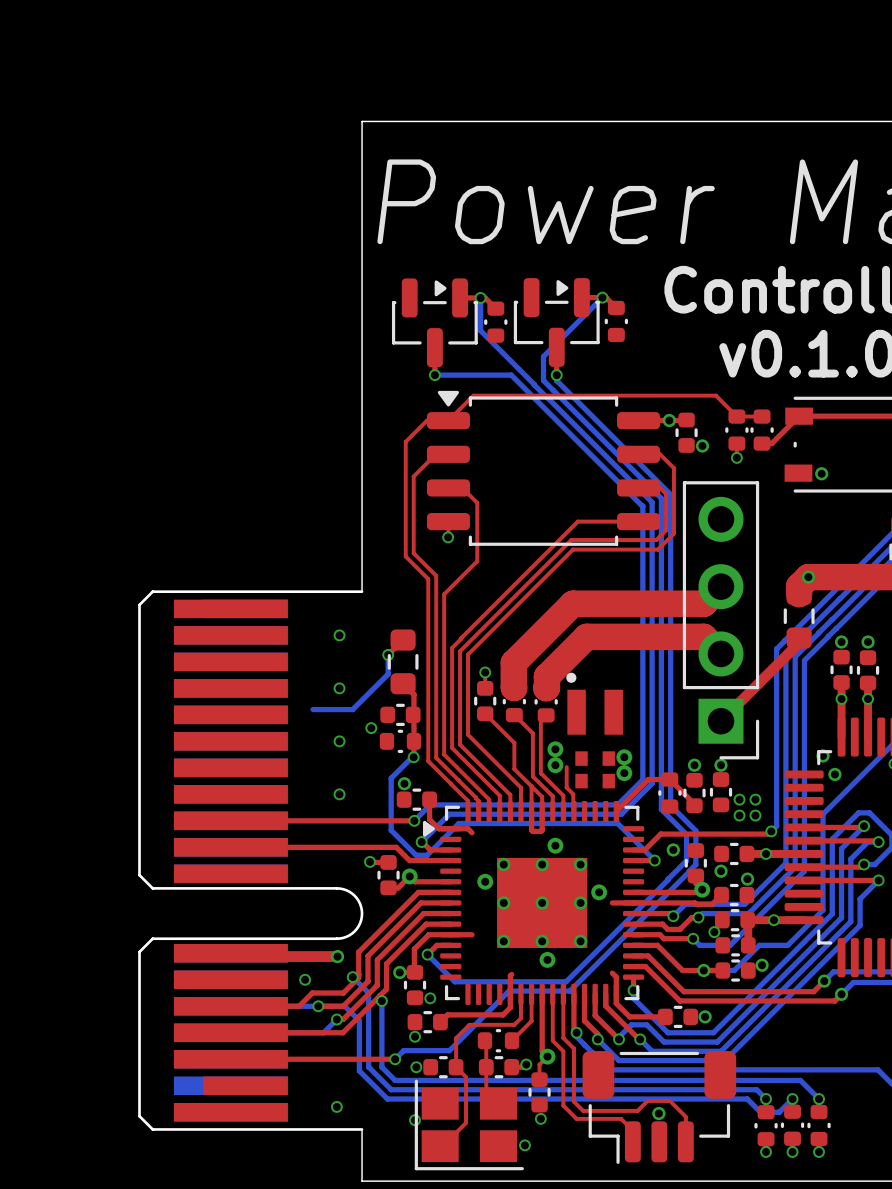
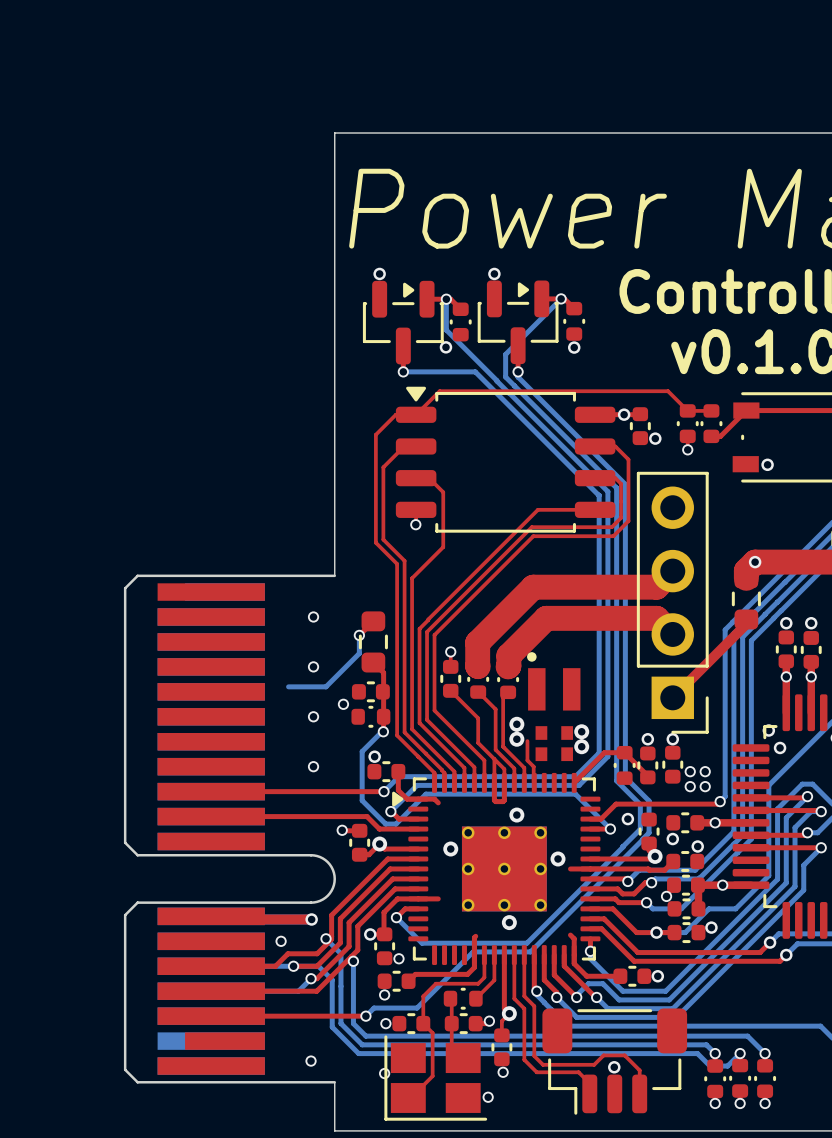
via: none -> (379, 273)
via: none -> (494, 273)
via: none -> (445, 347)
via: none -> (574, 347)

